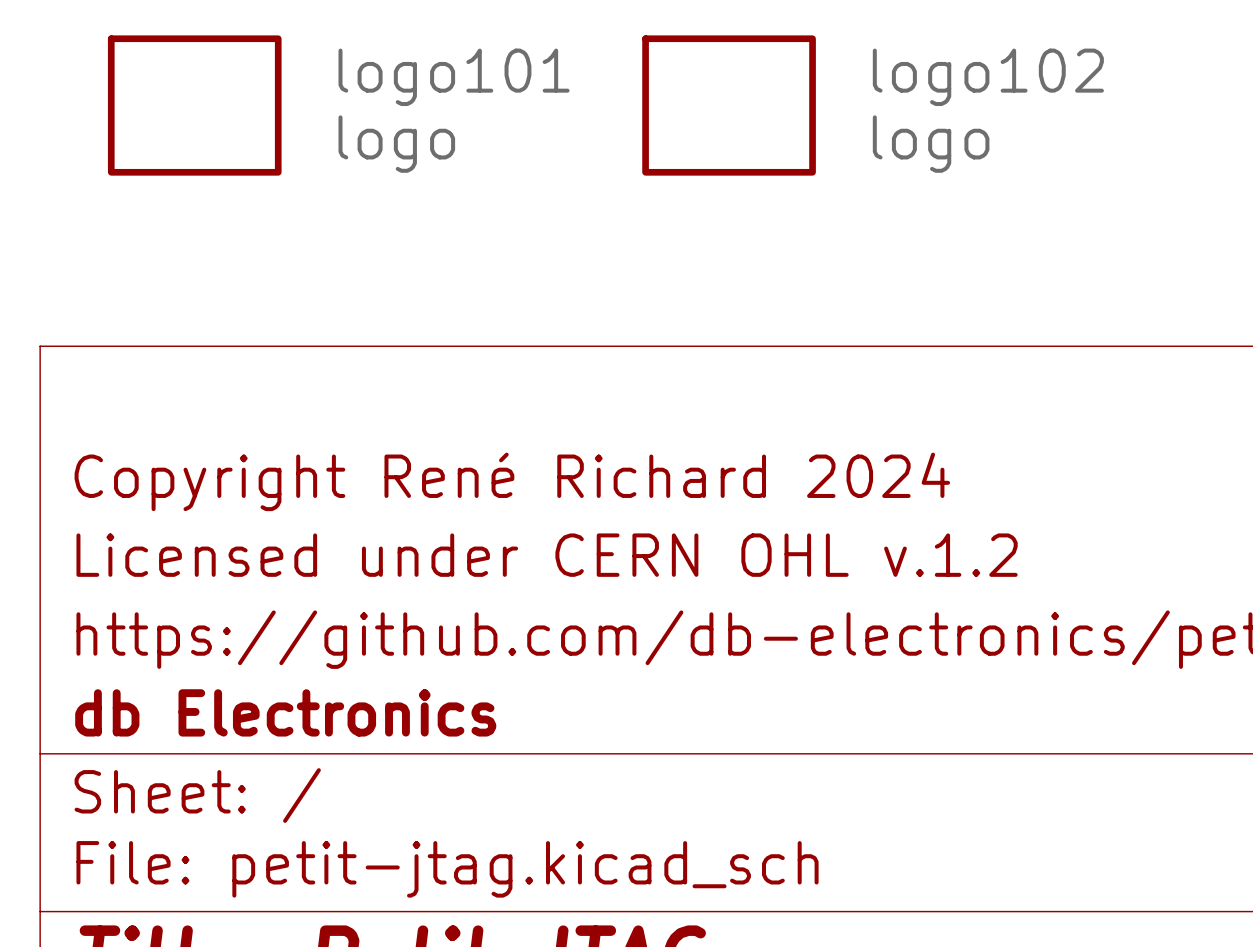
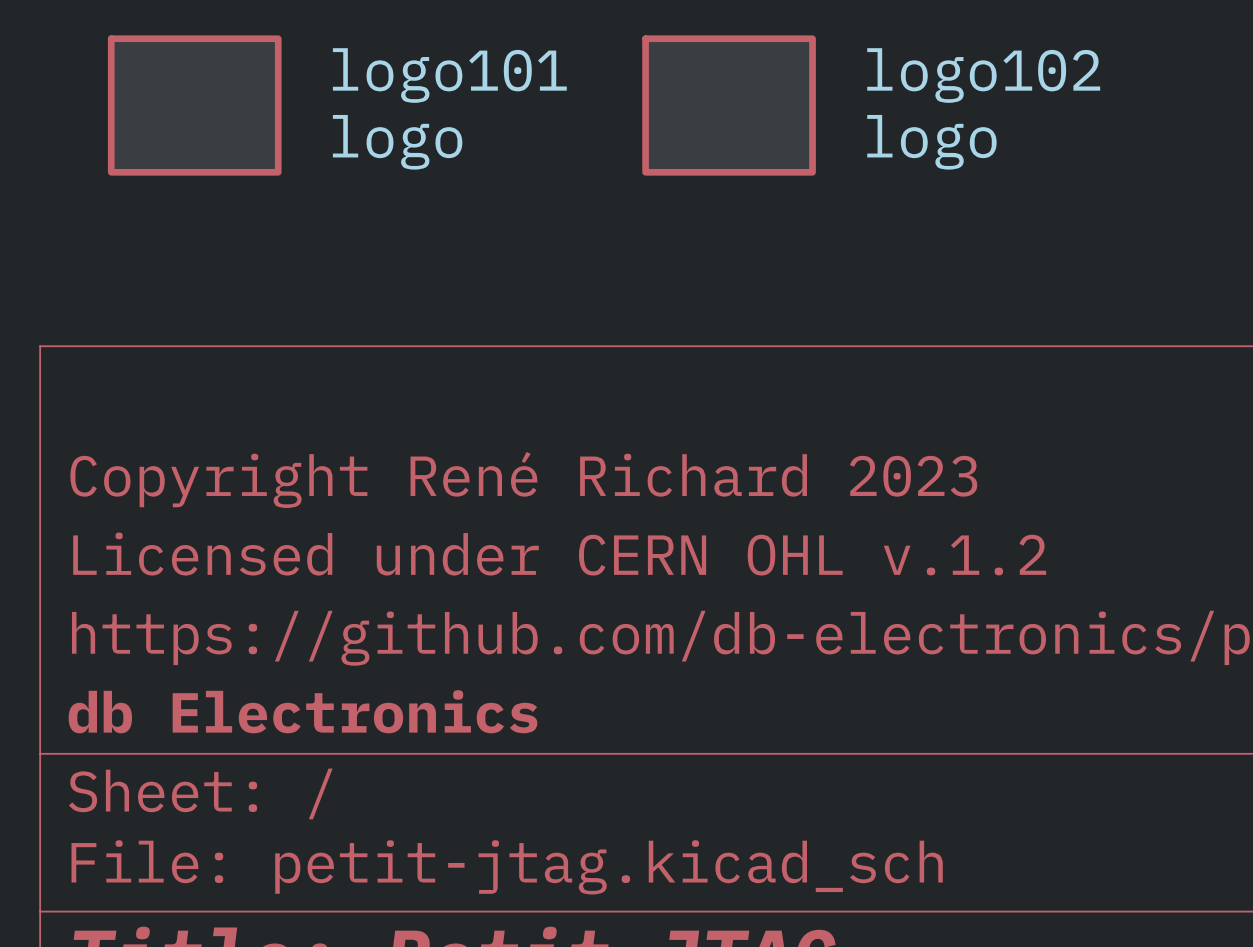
title block: Copyright René Richard 2024 (512, 481) -> Copyright René Richard 2023 (523, 479)

